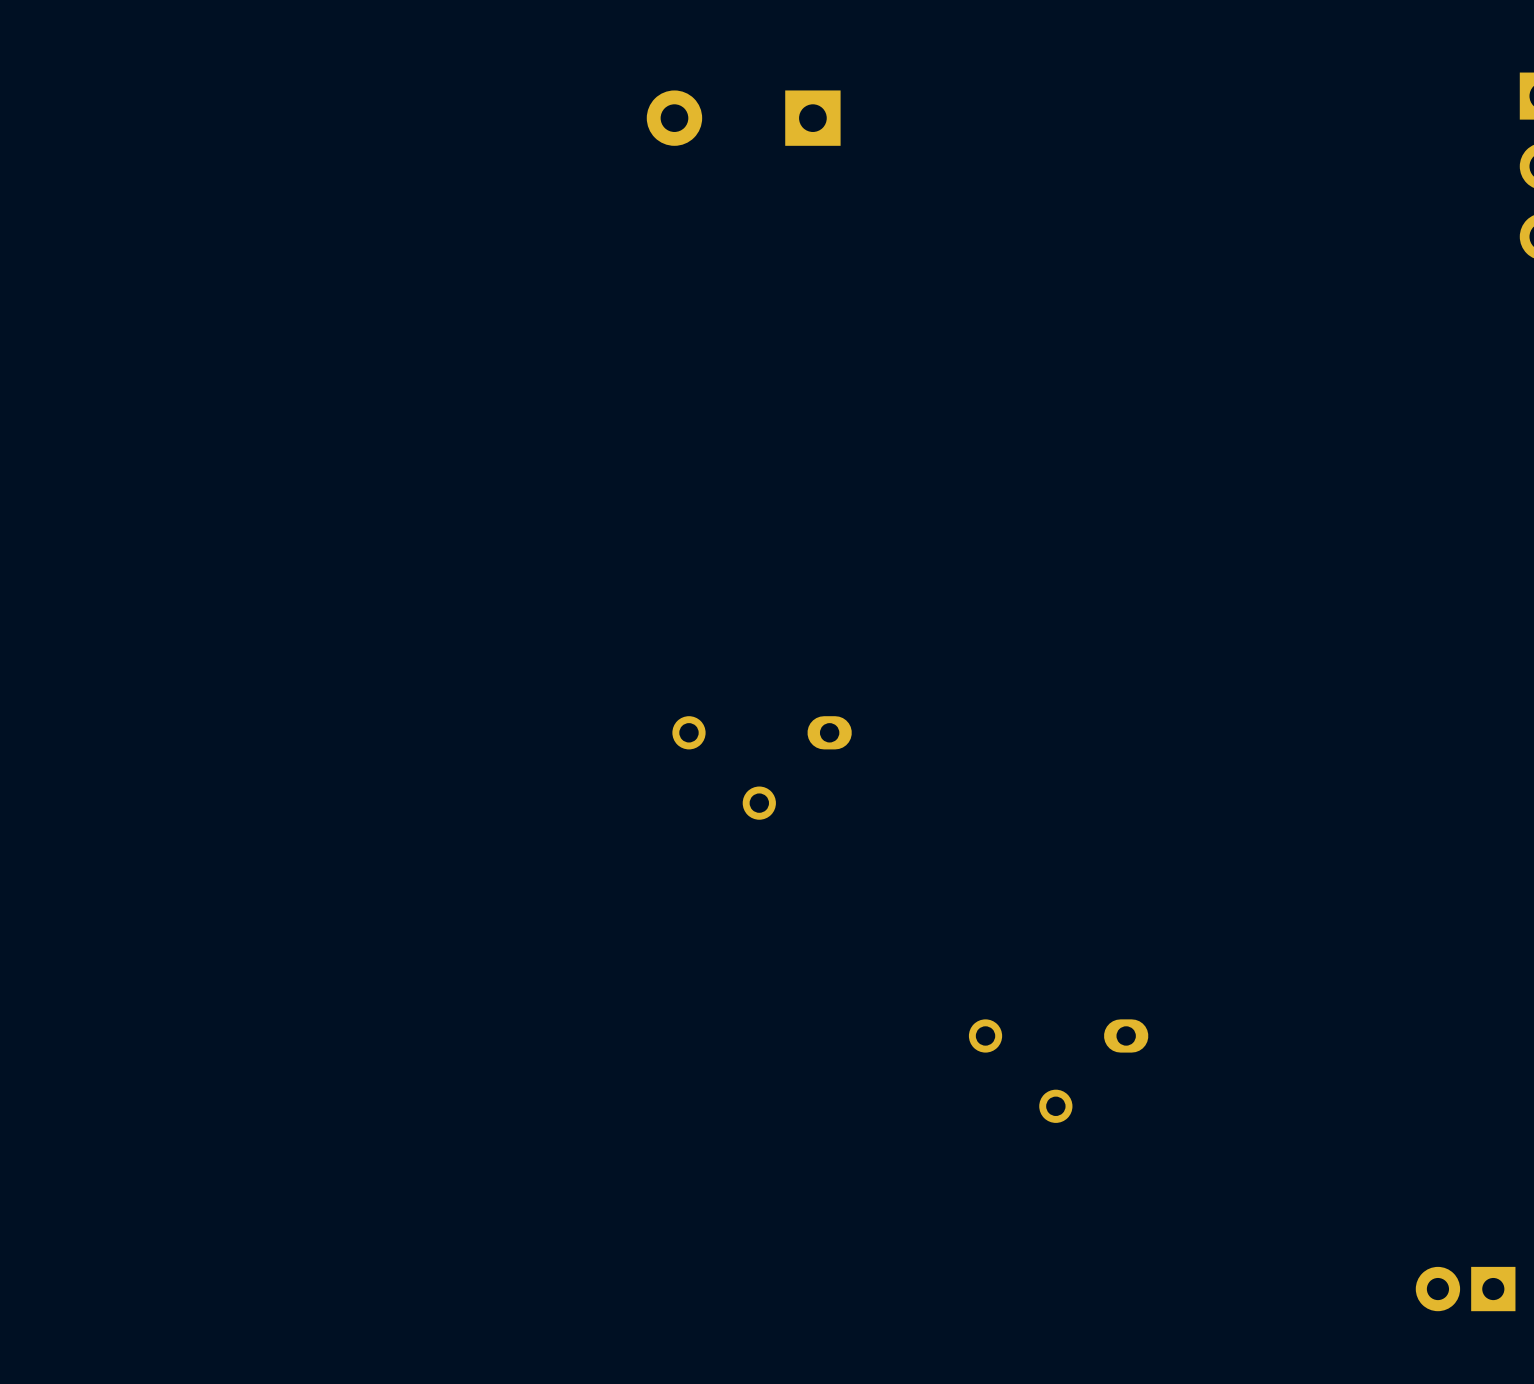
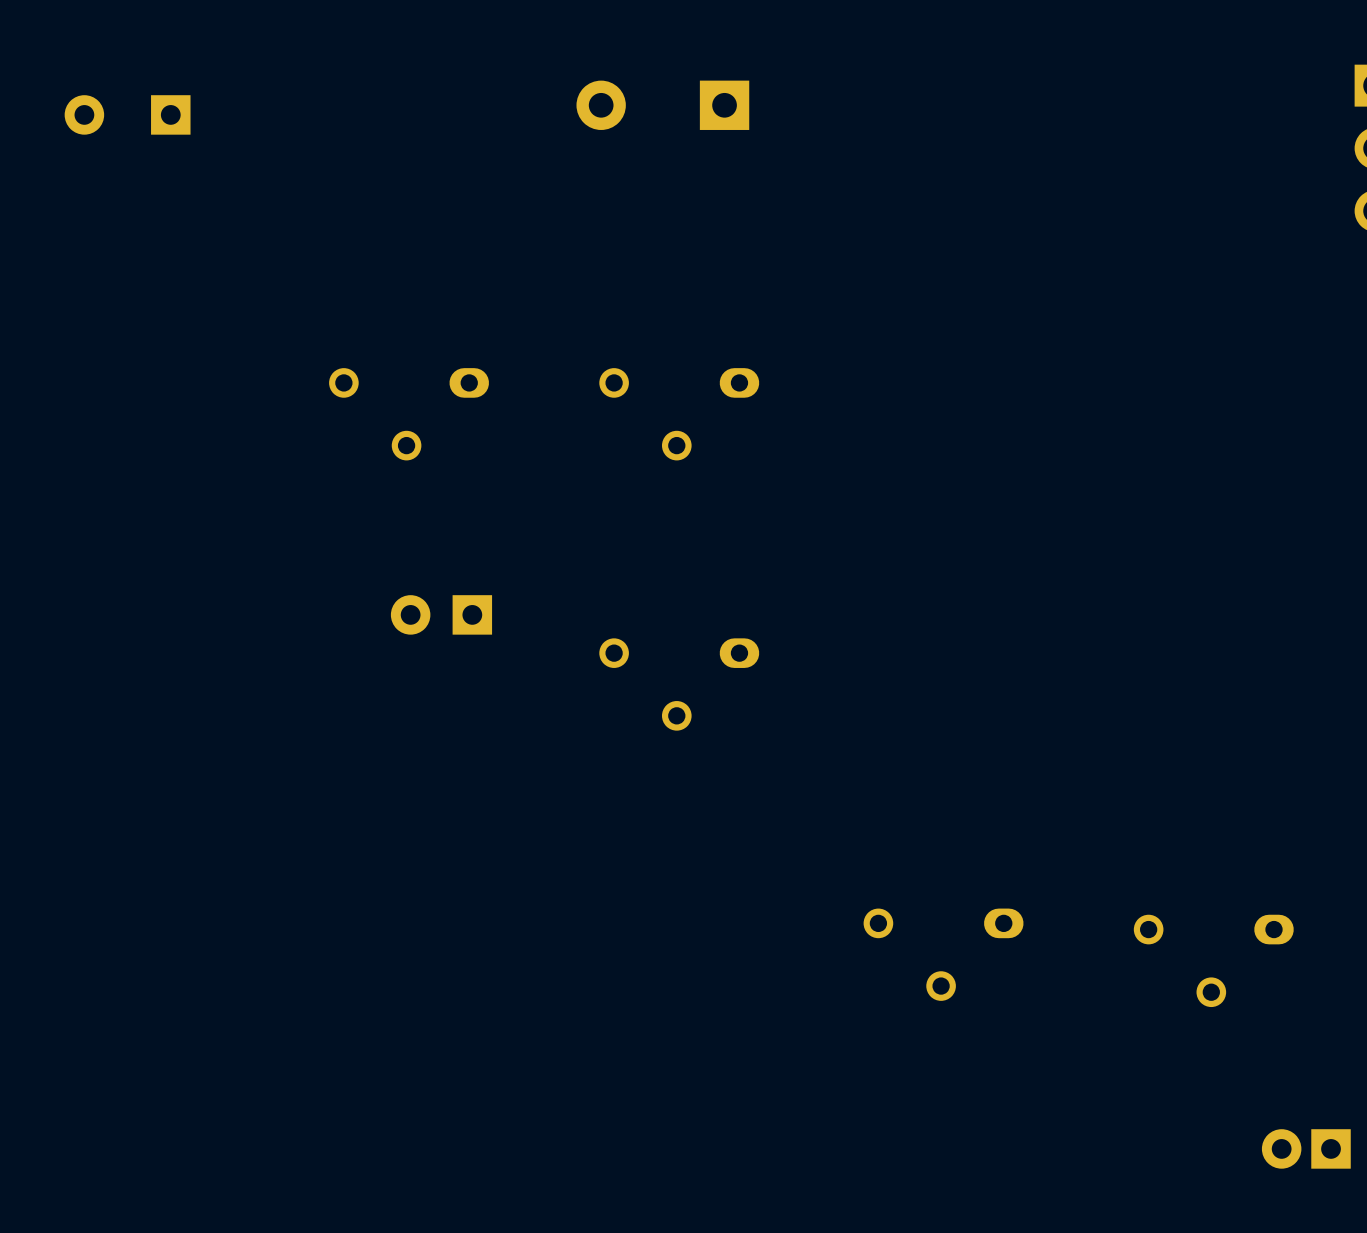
part: none -> (127, 114)
part: none -> (409, 414)
part: none -> (679, 414)
part: none -> (441, 614)
part: none -> (1213, 960)

